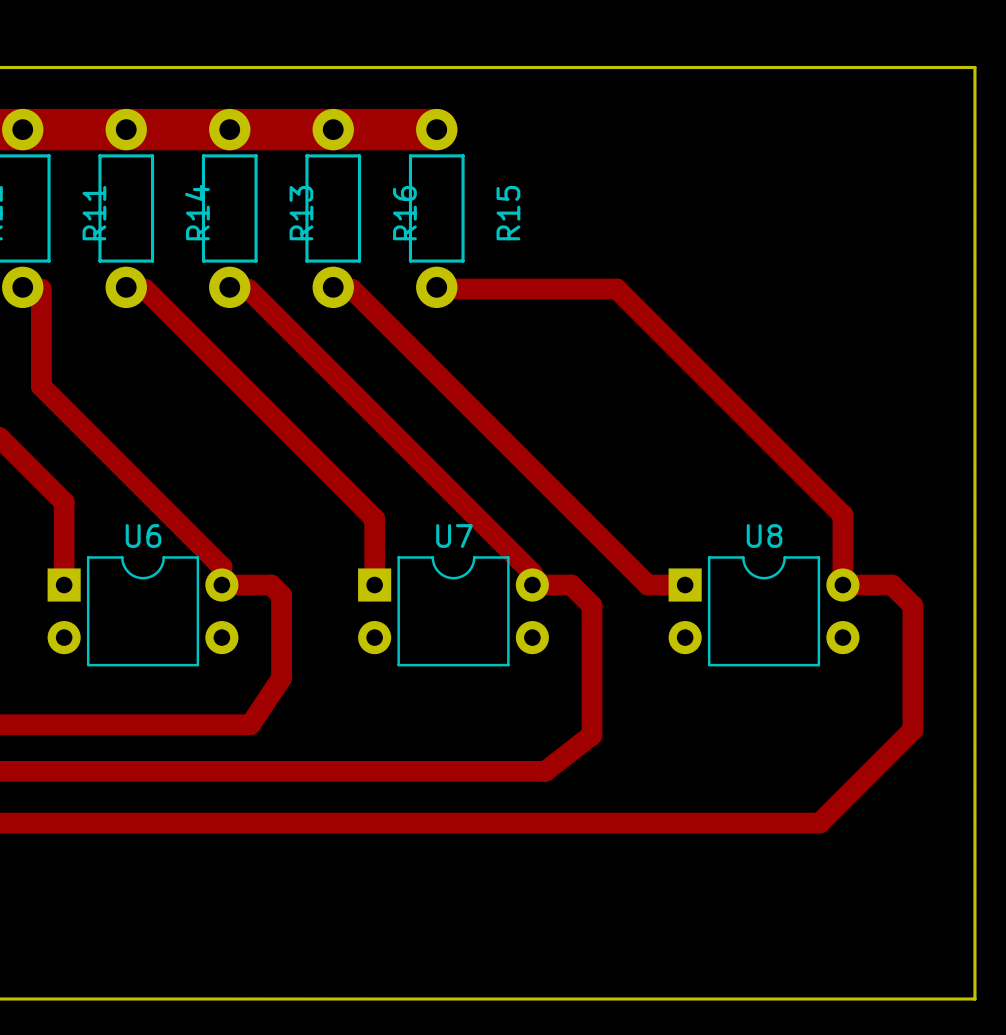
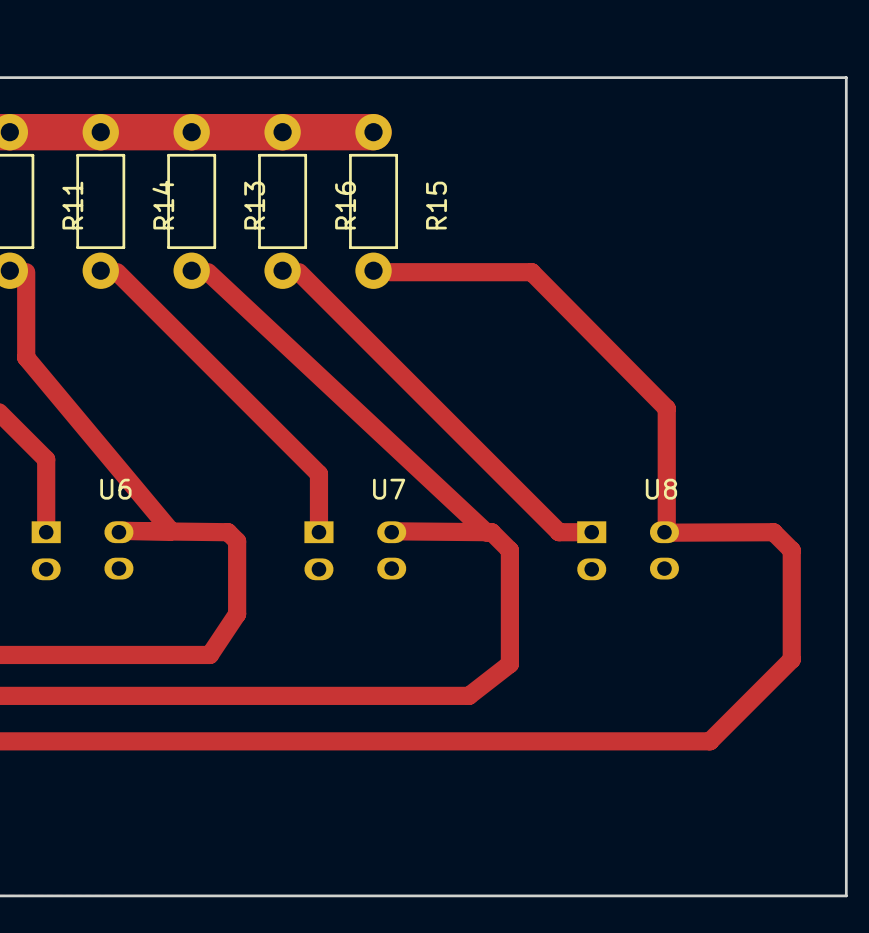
top track: (248, 289) (532, 573) (532, 585) (571, 585) -> (208, 272) (486, 532) (393, 531) (491, 532)
top track: (616, 289) (842, 515) (842, 585) (892, 585) -> (531, 272) (666, 408) (666, 532) (773, 532)
top track: (41, 386) (221, 566) (221, 585) (271, 585) -> (26, 357) (171, 531) (116, 530) (228, 532)
U6 footprint: [47, 556, 239, 667] -> [31, 521, 134, 581]
U7 footprint: [358, 556, 549, 667] -> [304, 521, 407, 581]
U8 footprint: [668, 556, 860, 667] -> [577, 521, 680, 581]

